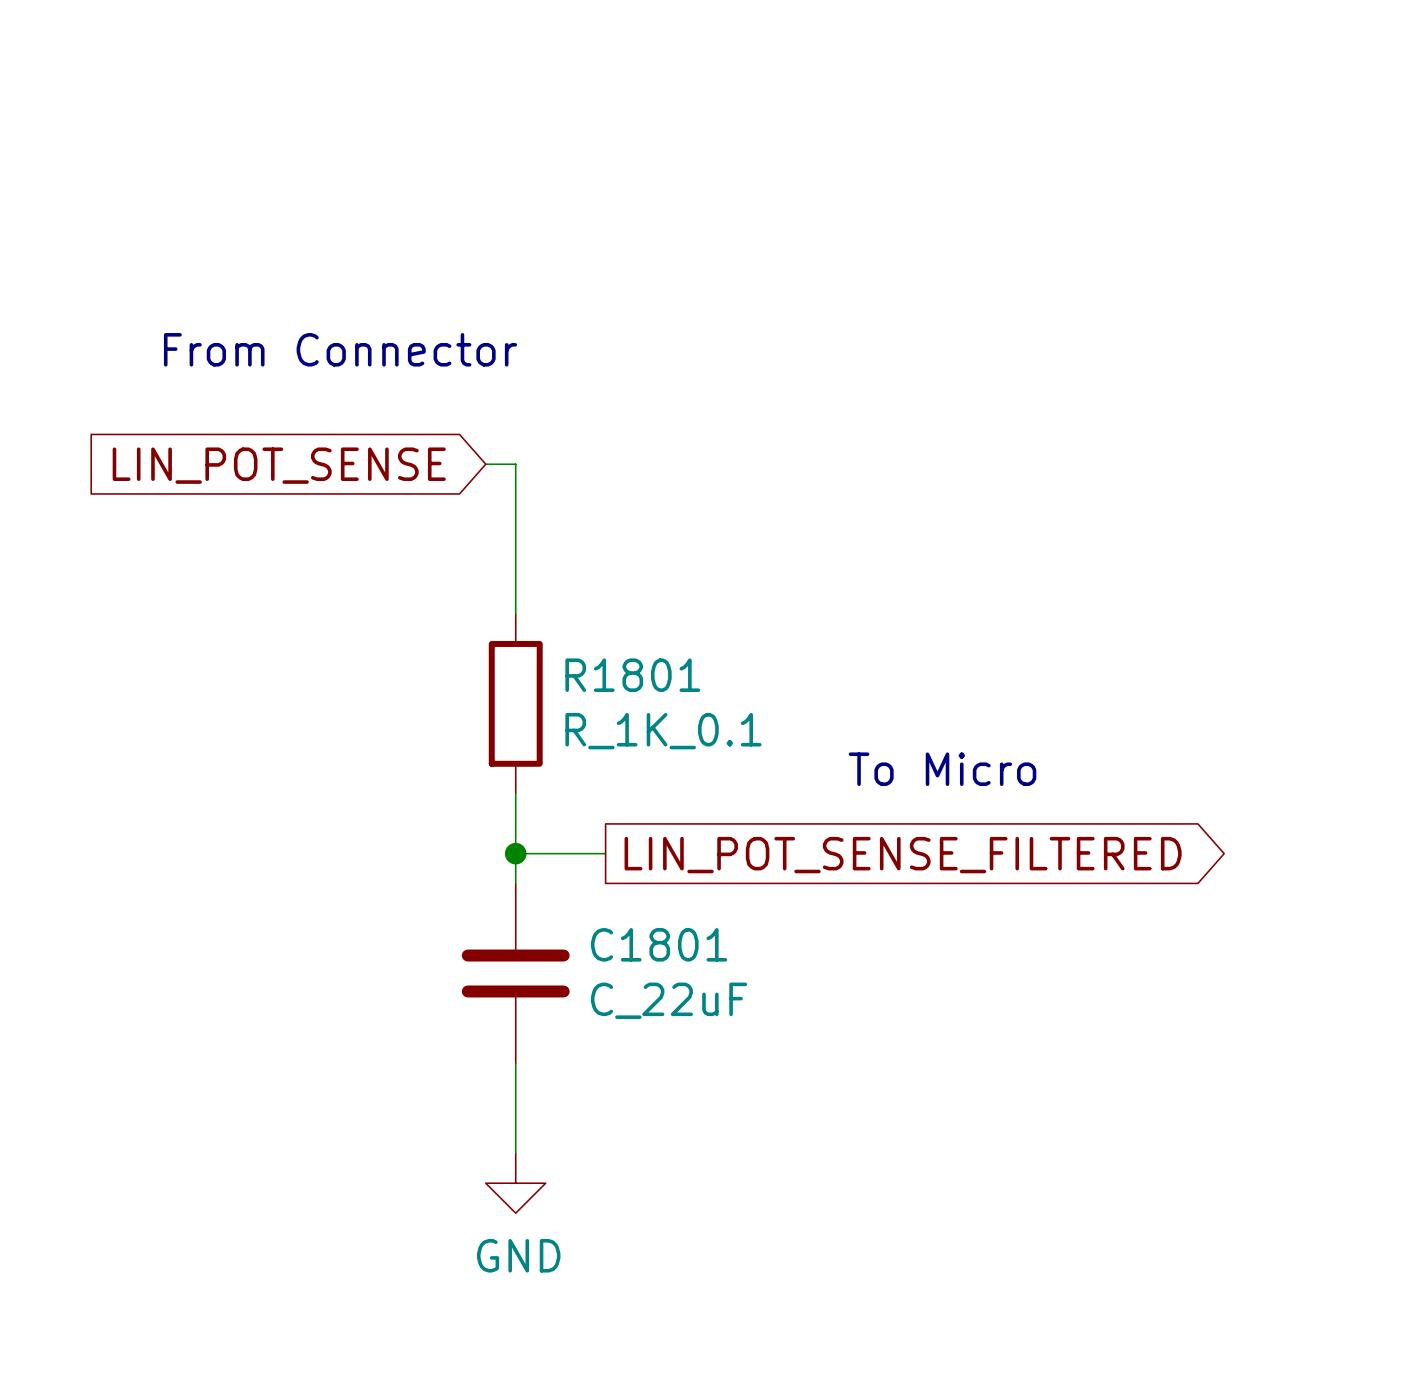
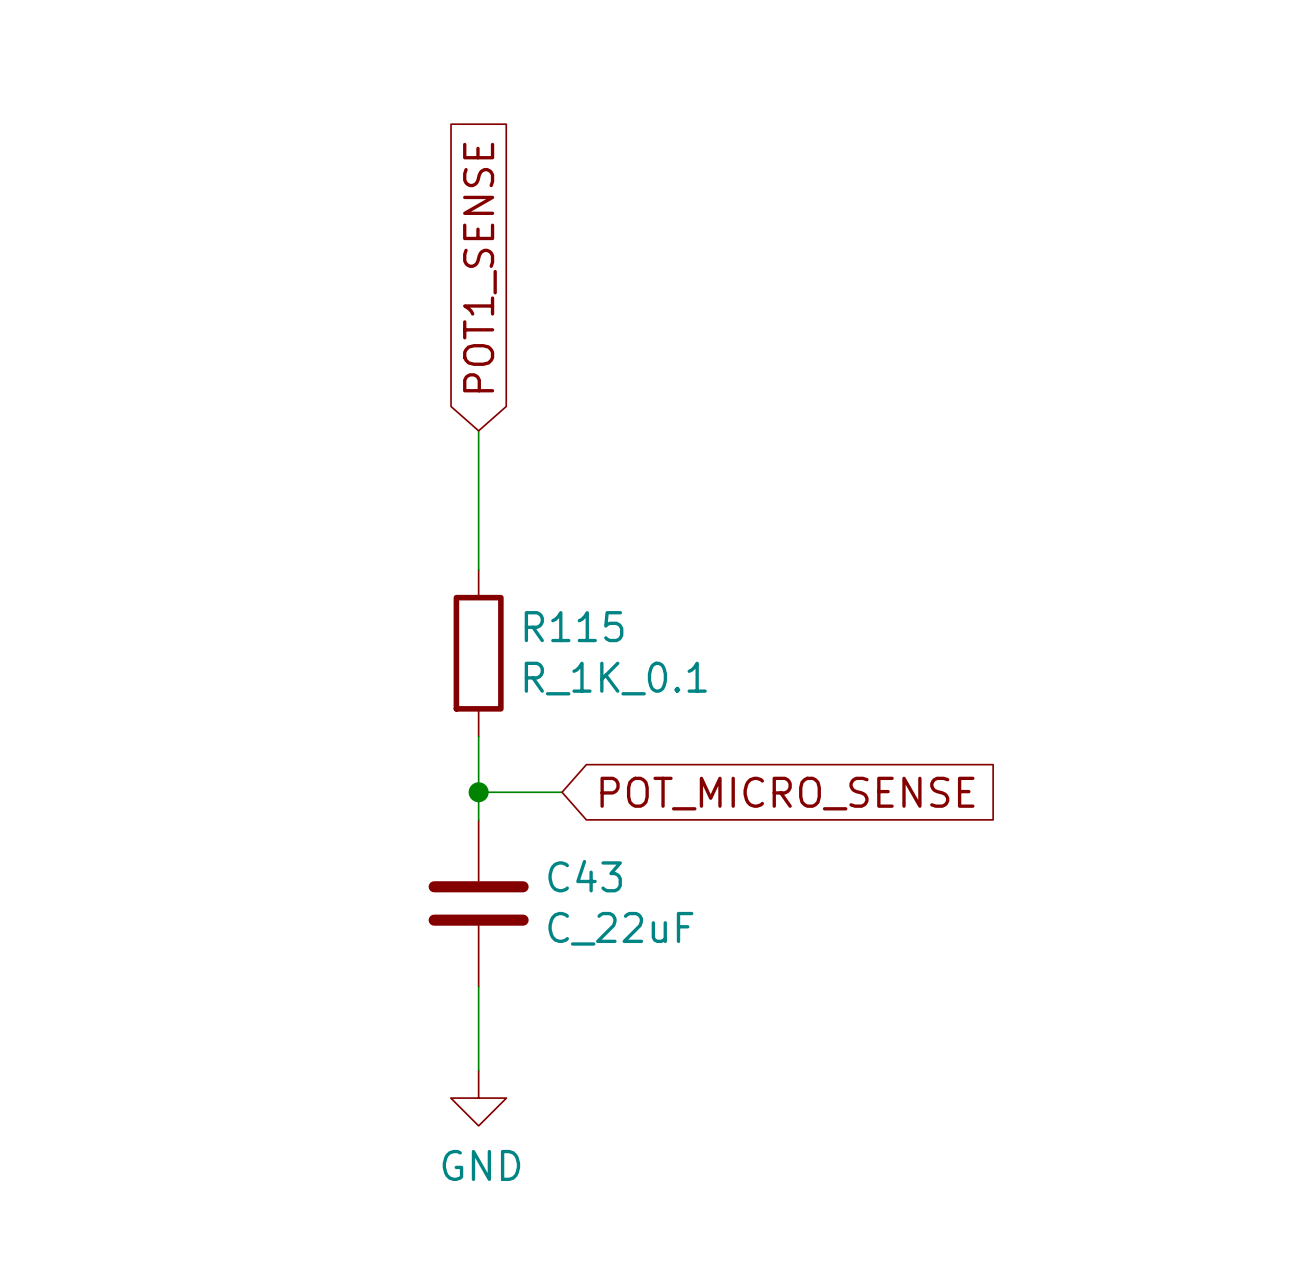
text: From Connector (340, 349) -> none
wire: (485, 464) (515, 464) -> none
global label: LIN_POT_SENSE (279, 465) -> POT1_SENSE (479, 267)
R1801 name: R1801 (632, 675) -> R115 (574, 626)
text: To Micro (942, 769) -> none
global label shape: output (903, 855) -> input (787, 793)
global label: LIN_POT_SENSE_FILTERED (903, 855) -> POT_MICRO_SENSE (787, 793)
C1801 name: C1801 (659, 944) -> C43 (585, 876)

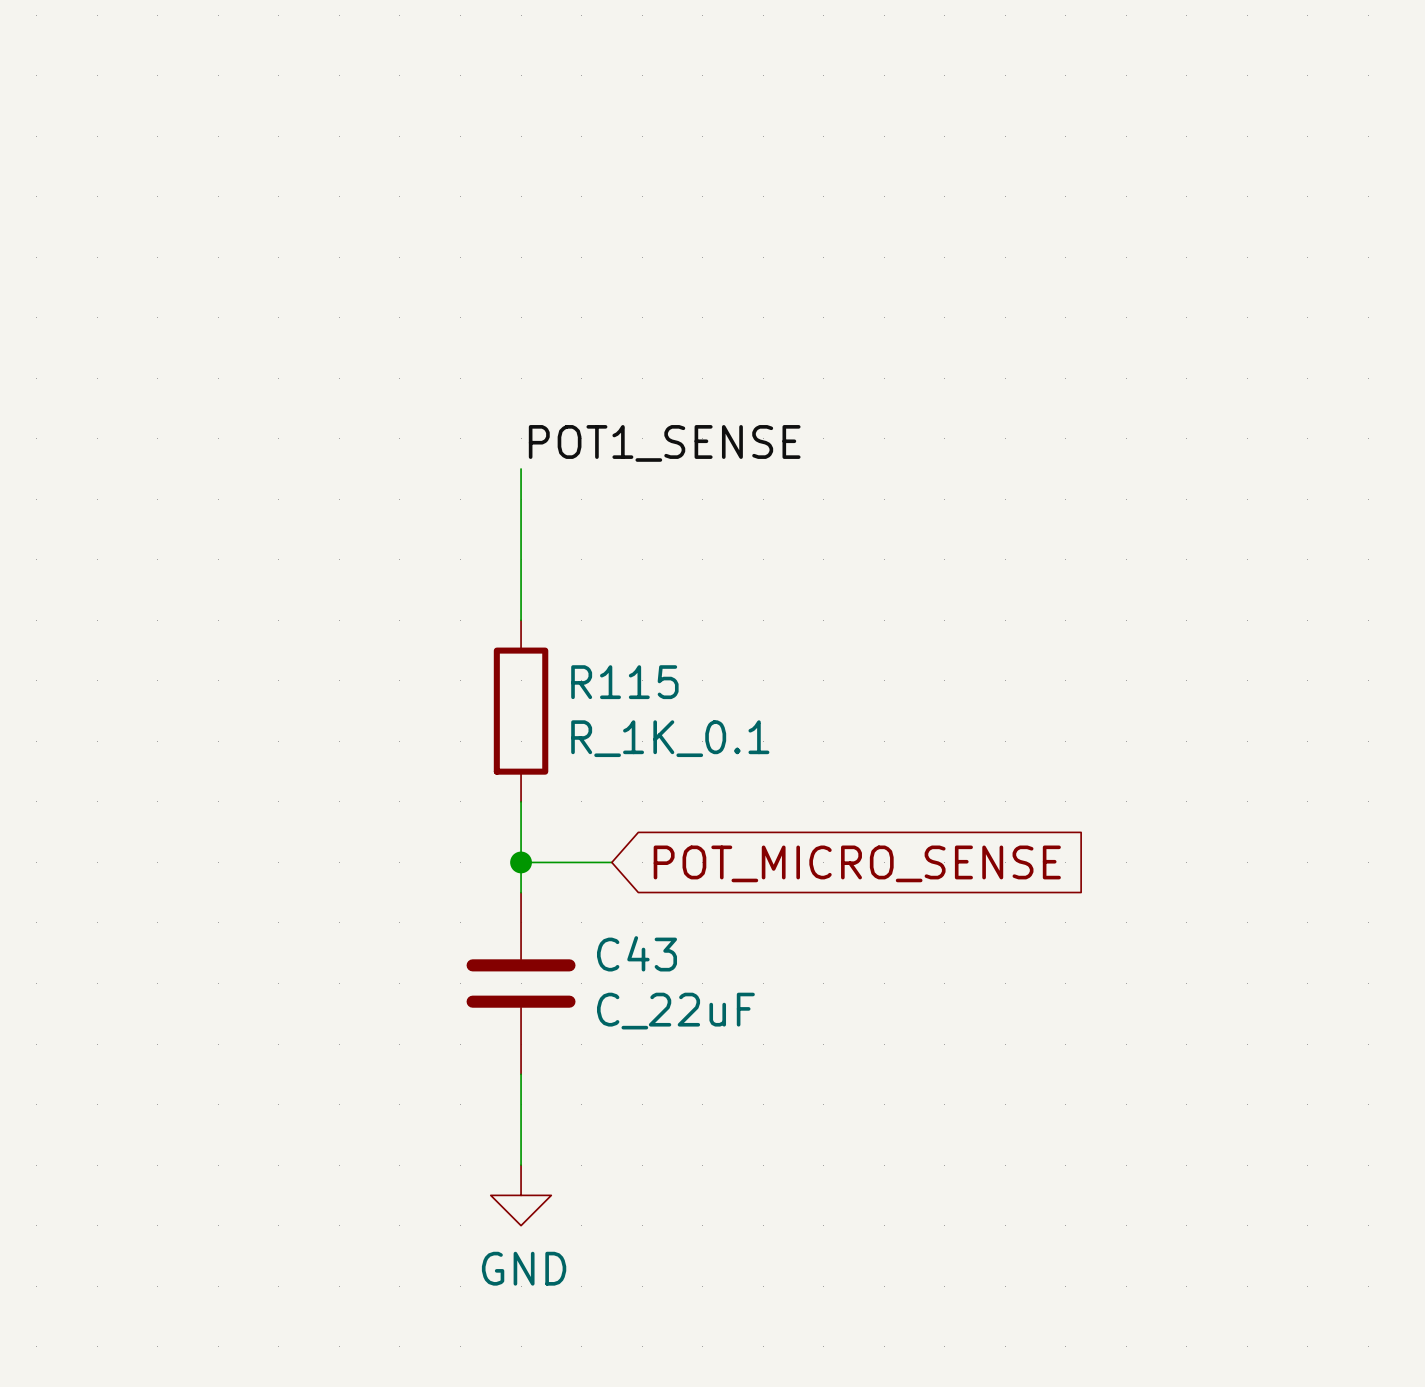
global label: POT1_SENSE (479, 267) -> none
label: none -> POT1_SENSE (664, 443)

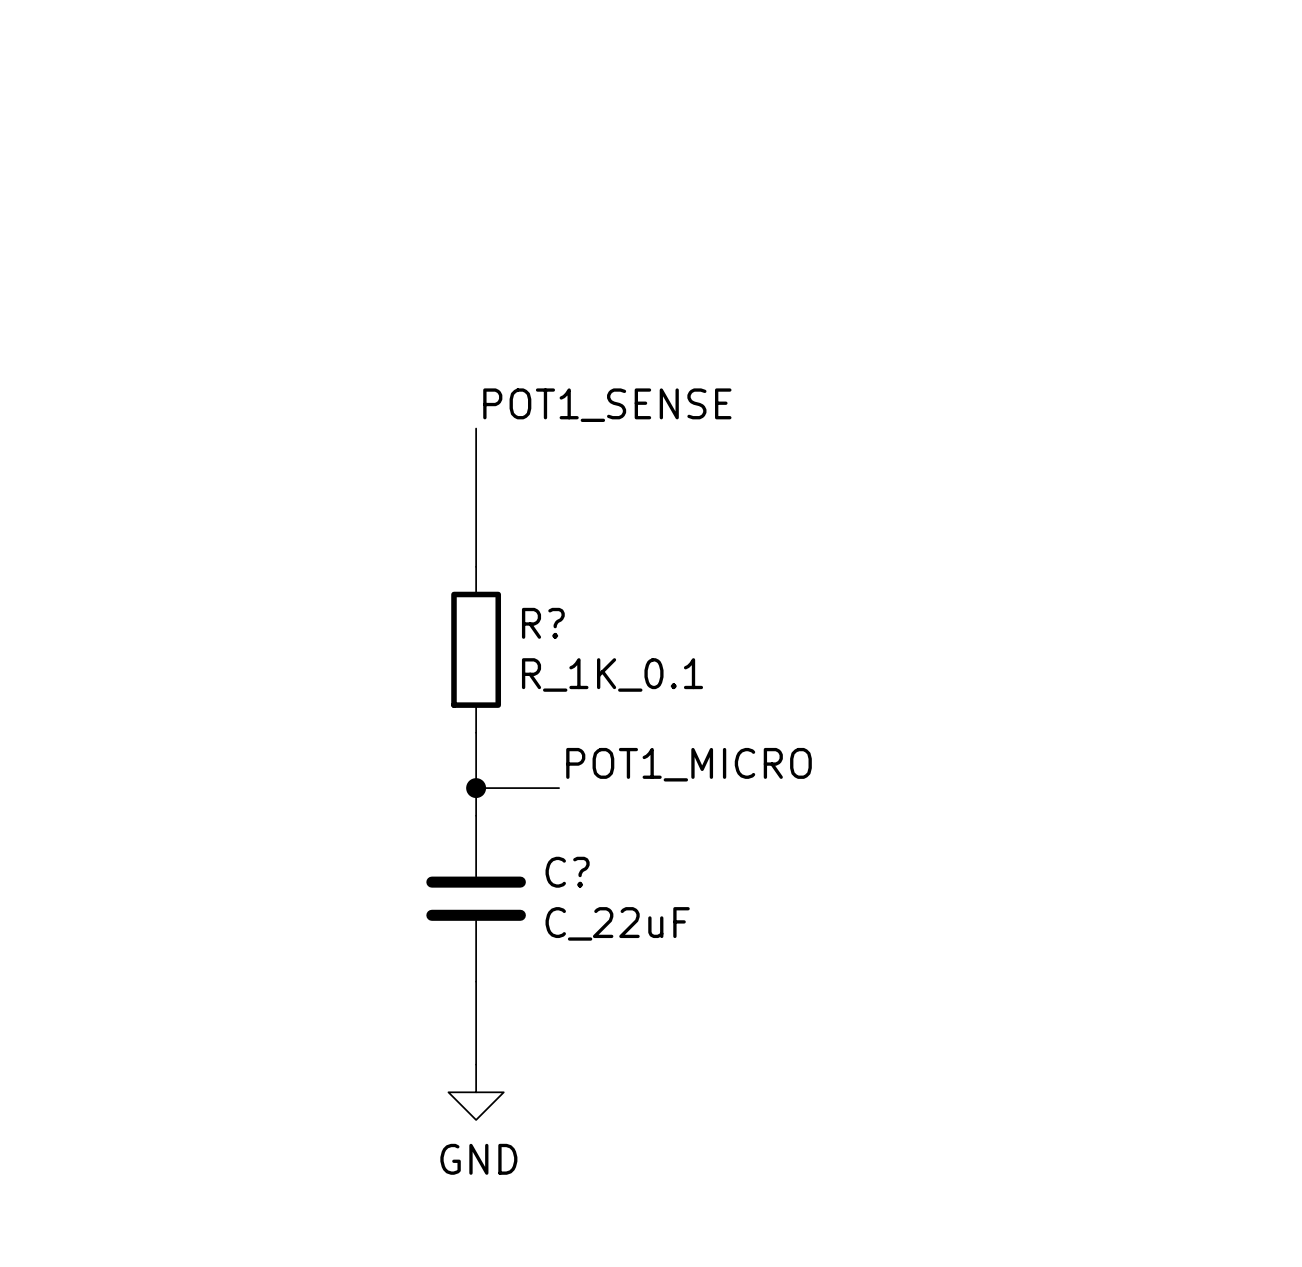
R115 name: R115 (624, 682) -> R? (543, 623)
label: none -> POT1_MICRO (689, 764)
global label: POT_MICRO_SENSE (857, 863) -> none
C43 name: C43 (637, 953) -> C? (567, 872)

